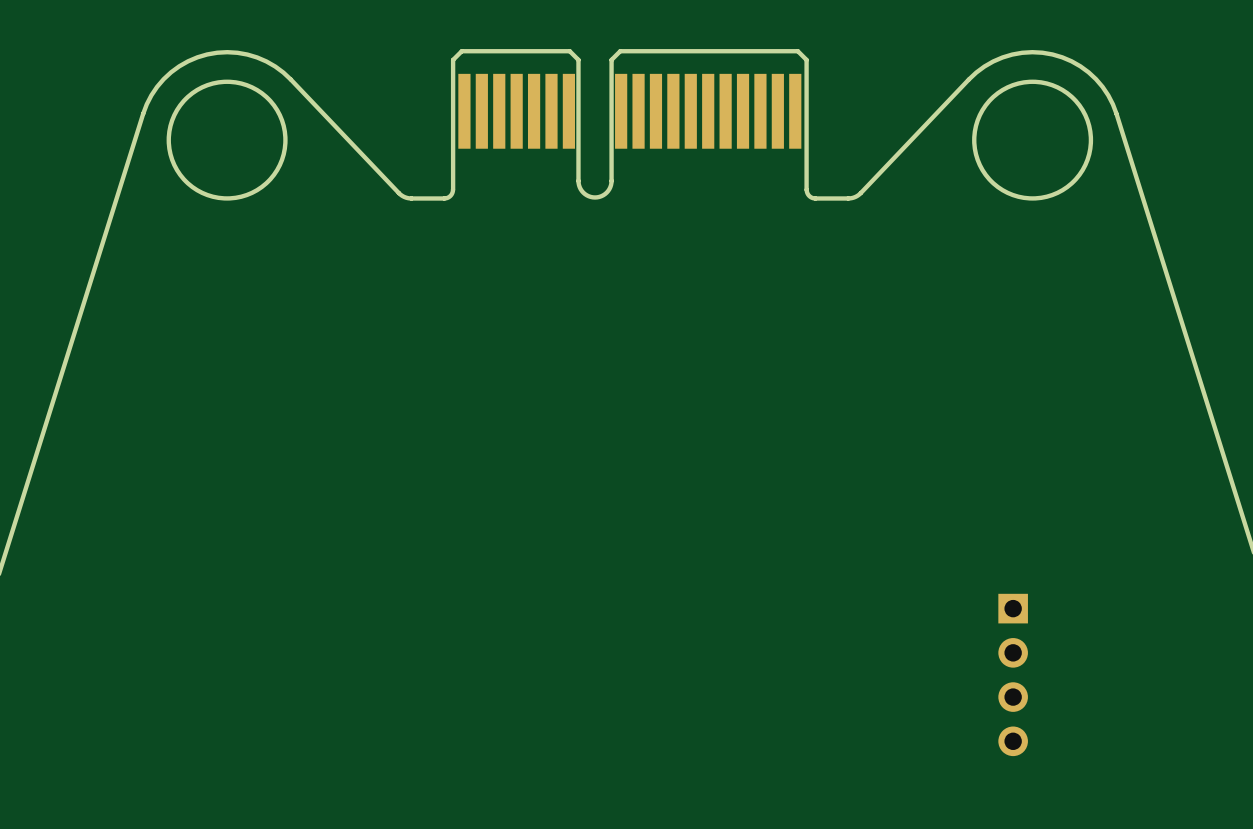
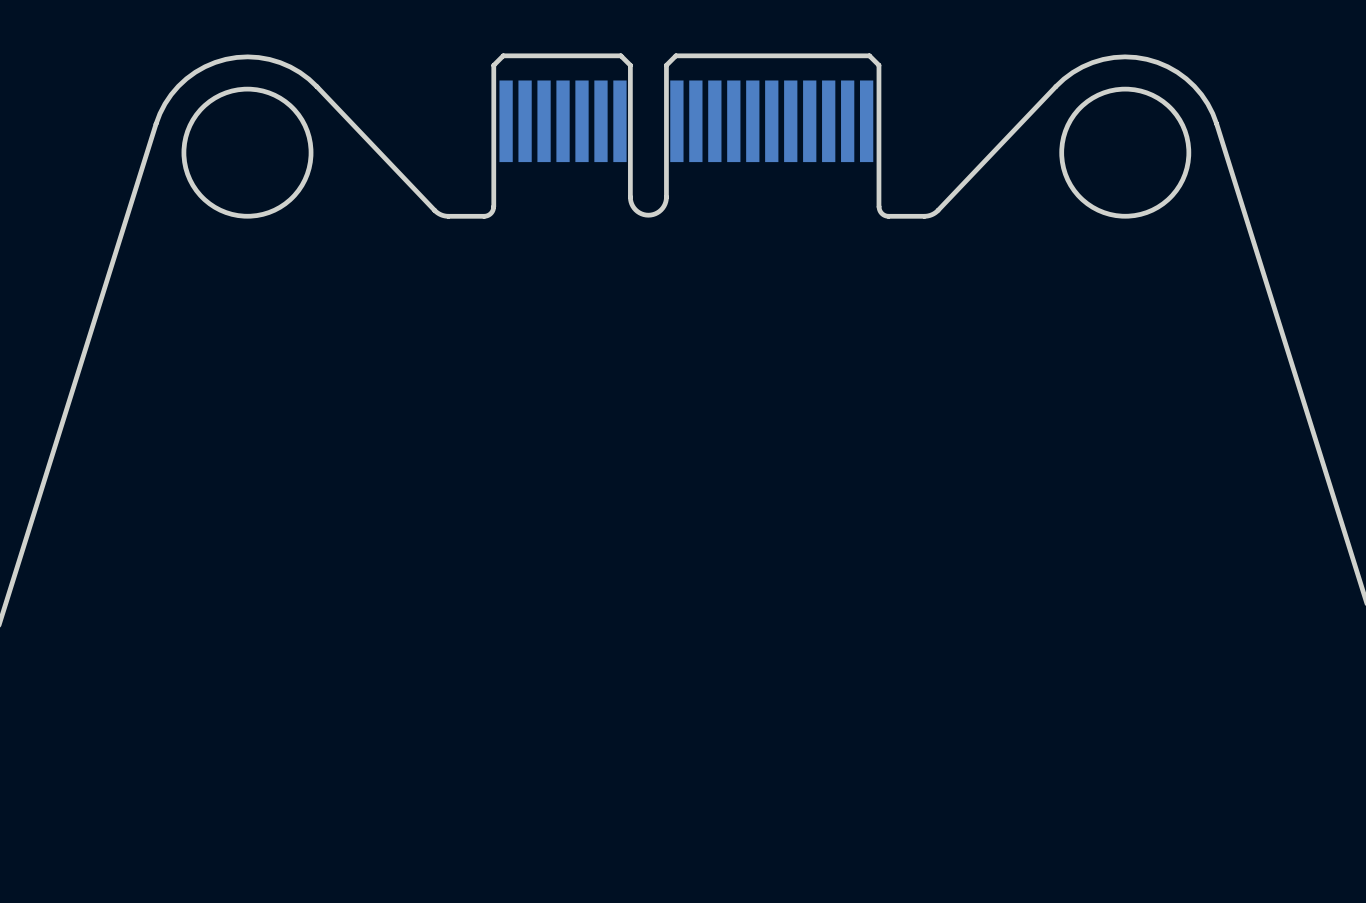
part: (1013, 674) -> none

